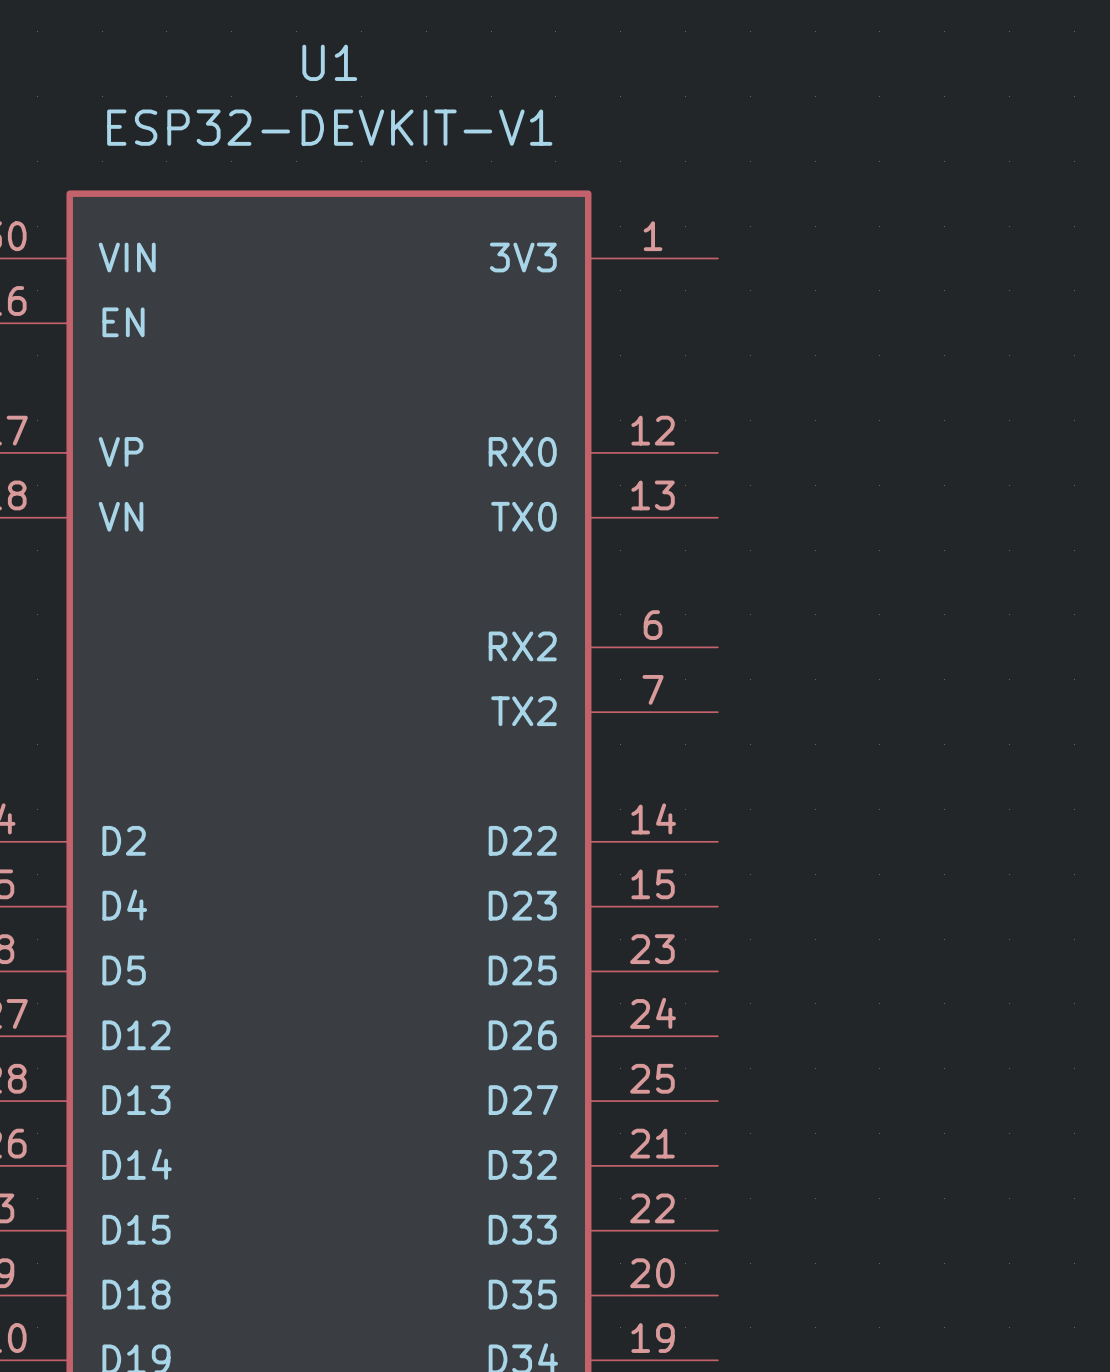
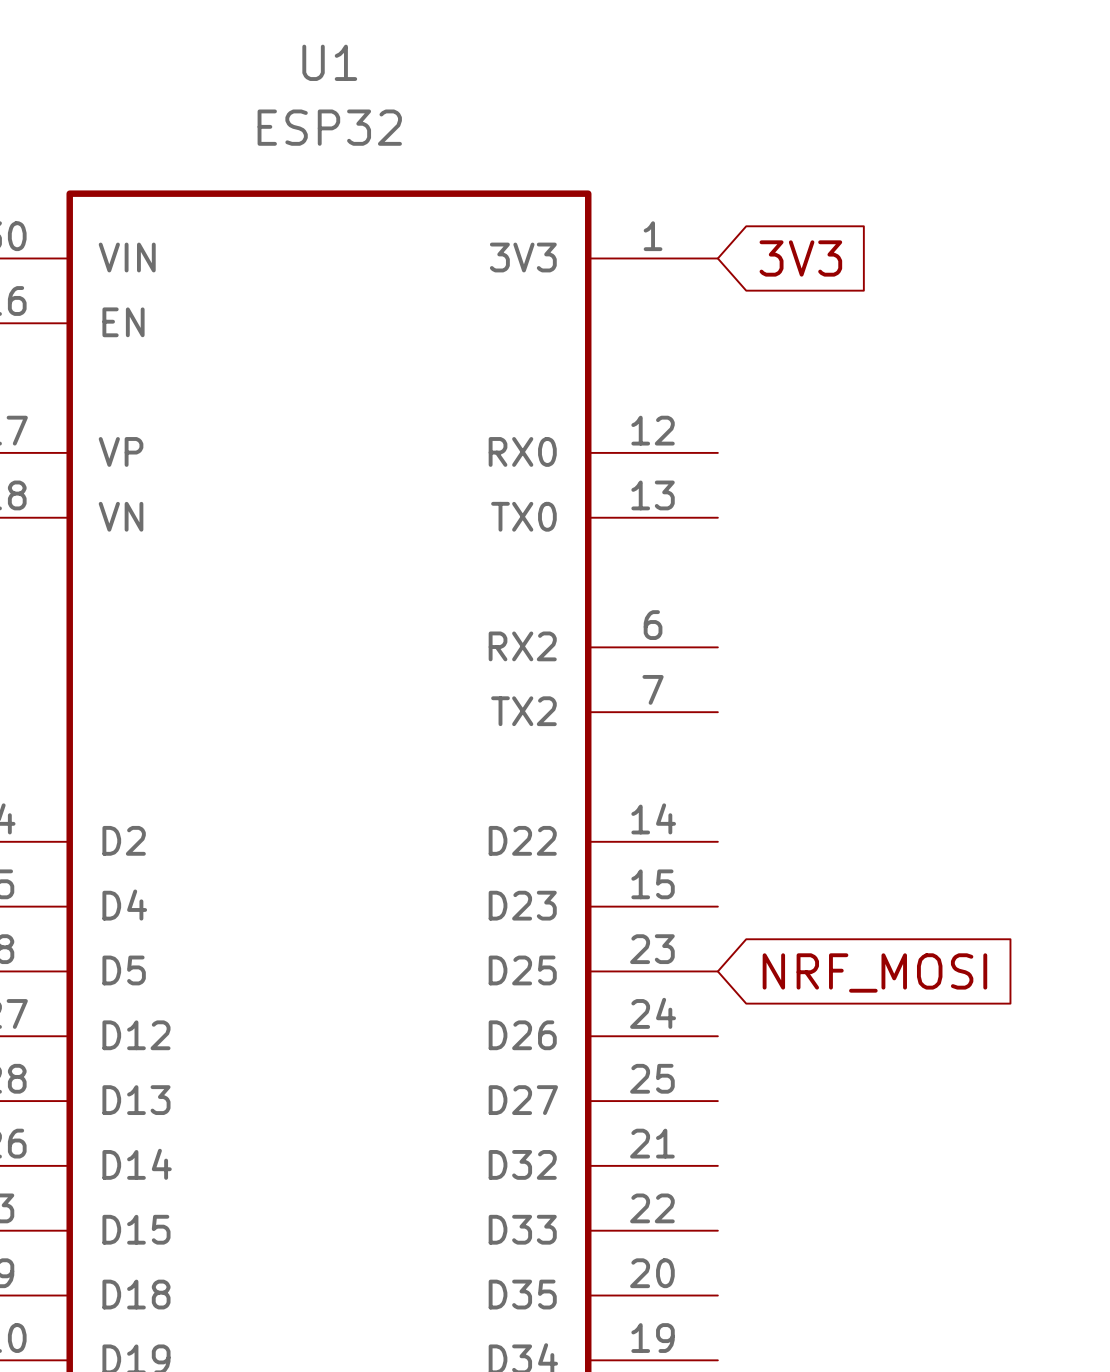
U1 value: ESP32-DEVKIT-V1 (329, 127) -> ESP32 (329, 127)
global label: none -> 3V3 (800, 258)
global label: none -> NRF_MOSI (874, 972)

